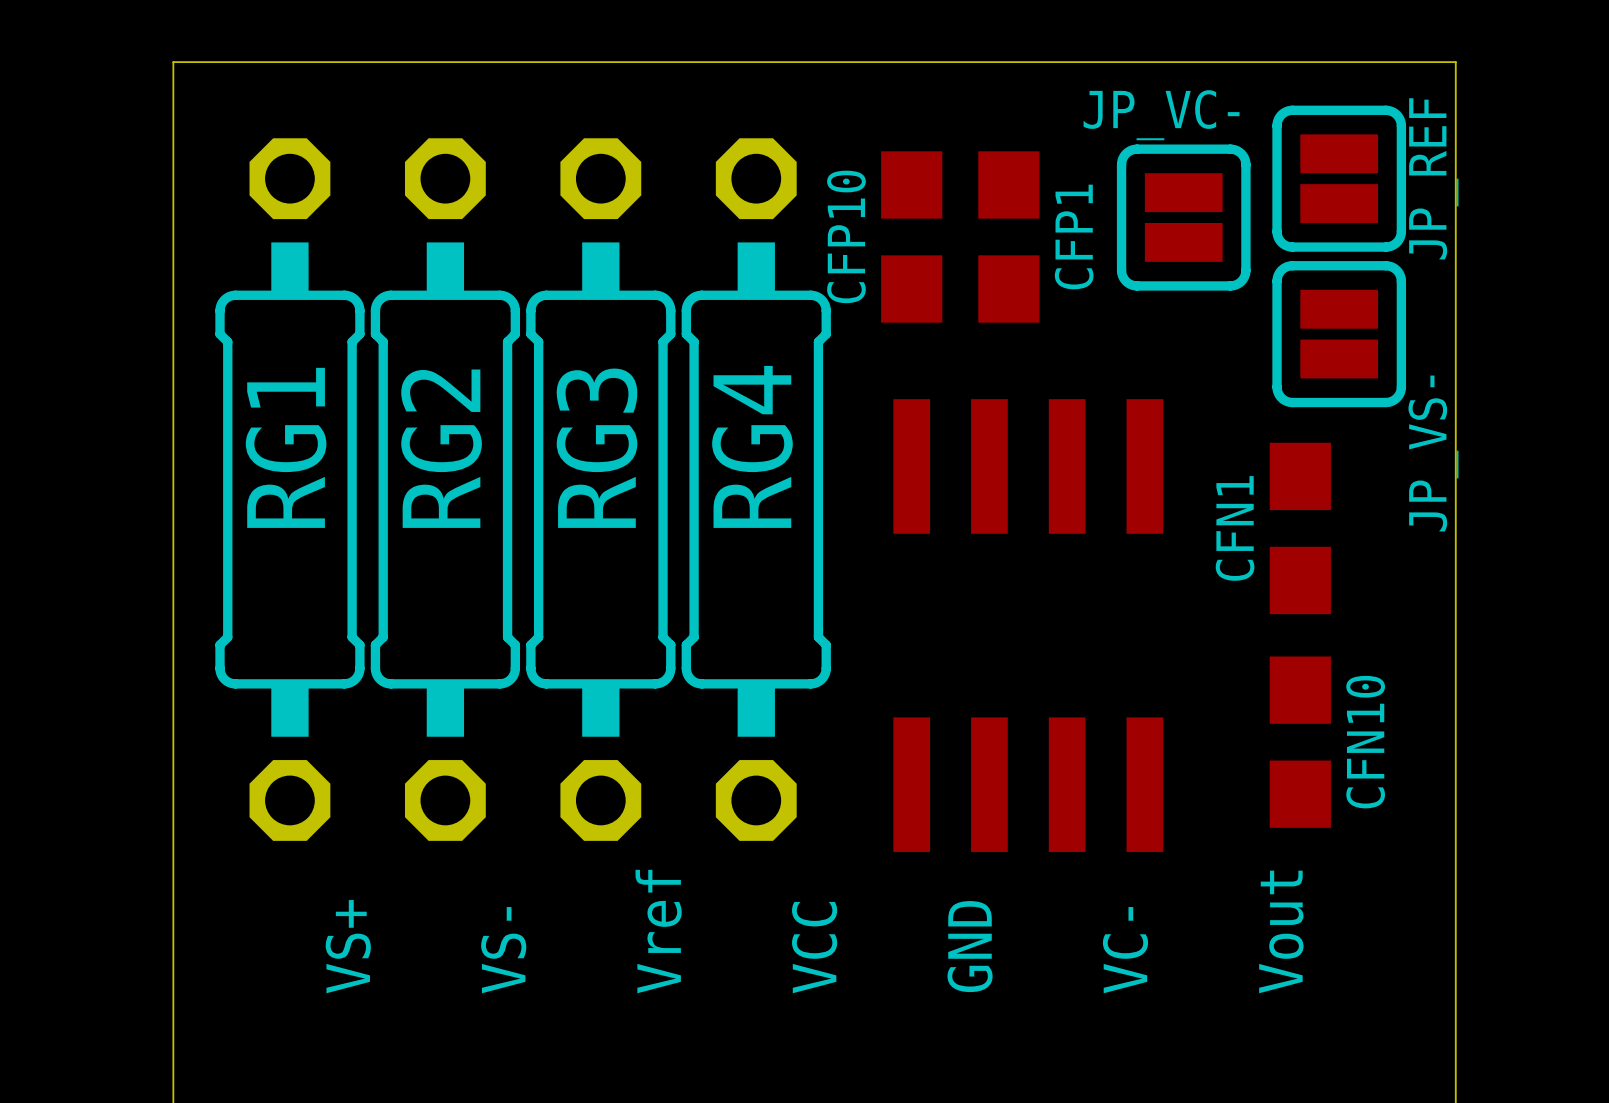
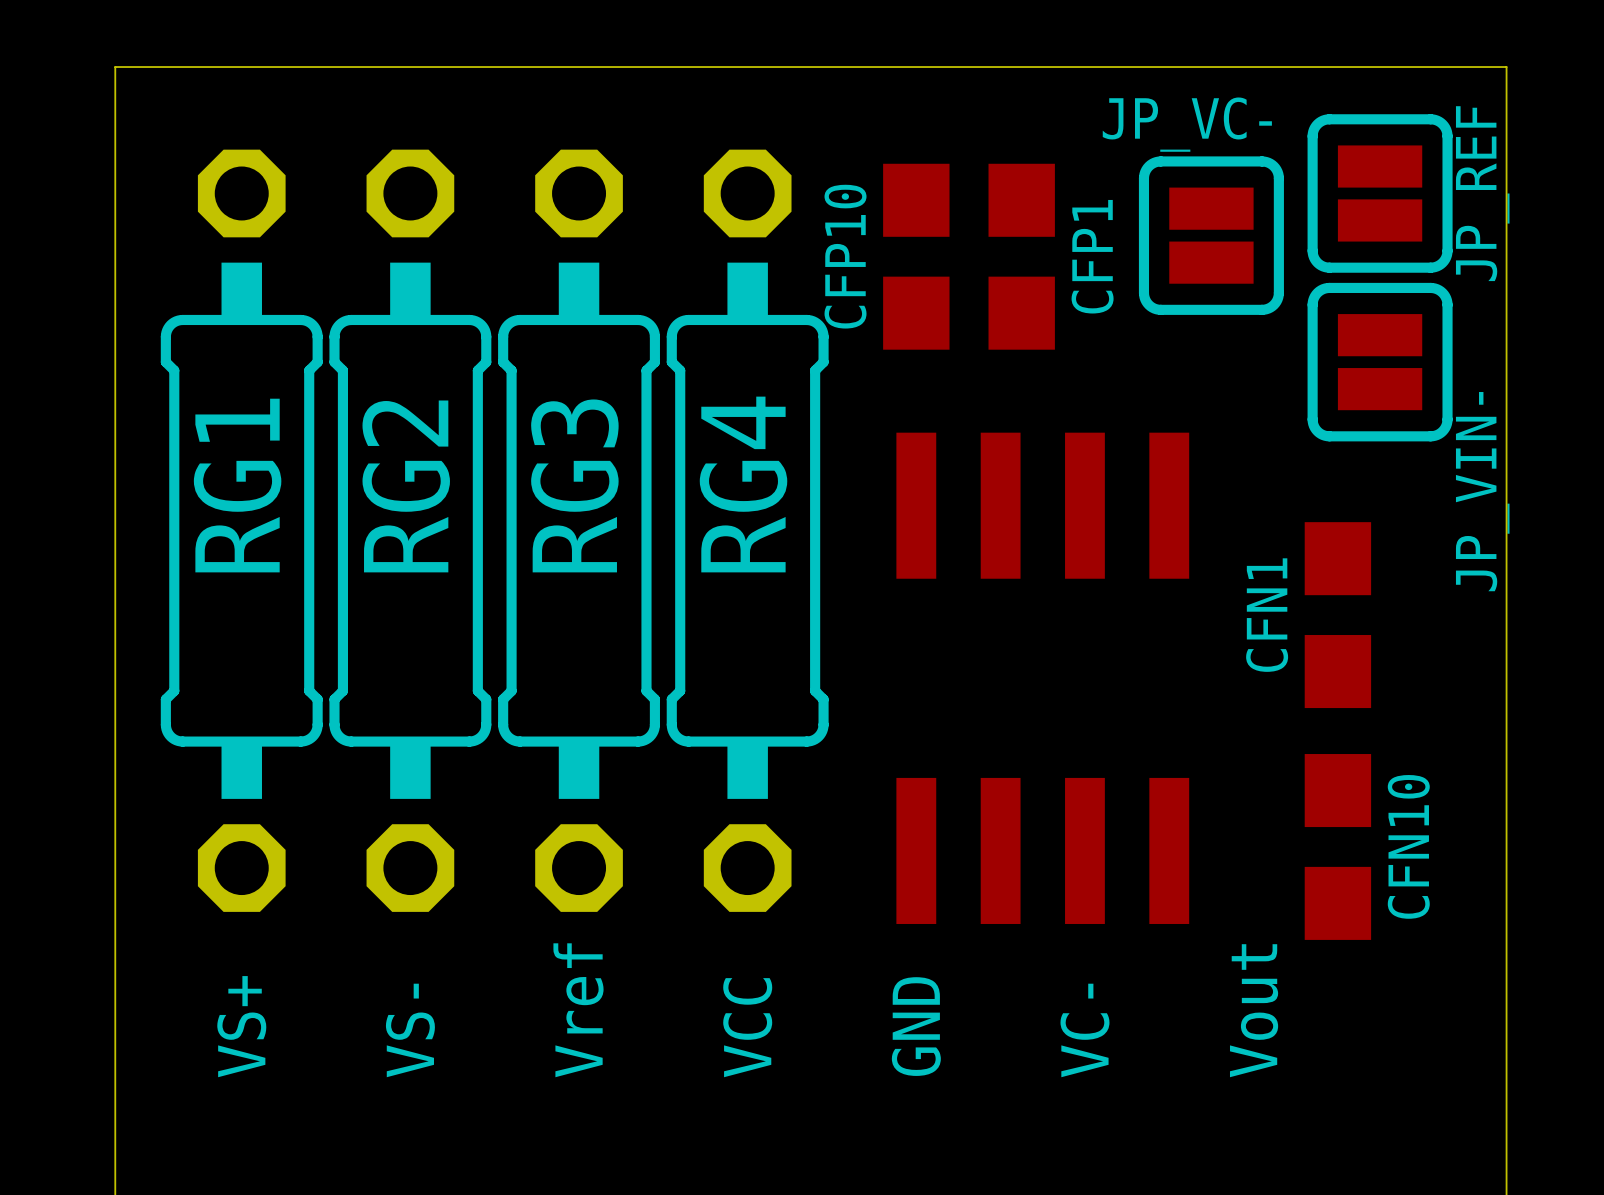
JP_VS- name: JP_VS- (1433, 453) -> JP_VIN- (1482, 491)
CFN1 position: (1300, 528) -> (1337, 615)
CFN10 position: (1300, 742) -> (1337, 846)
text position: Vref (658, 931) -> Vref (578, 1010)
text position: Vout (1281, 931) -> Vout (1254, 1010)
text position: VS+ (348, 946) -> VS+ (241, 1026)
text position: GND (970, 946) -> GND (916, 1026)
text position: VCC (814, 947) -> VCC (747, 1027)
text position: VS- (503, 950) -> VS- (410, 1030)
text position: VC- (1125, 950) -> VC- (1084, 1030)

